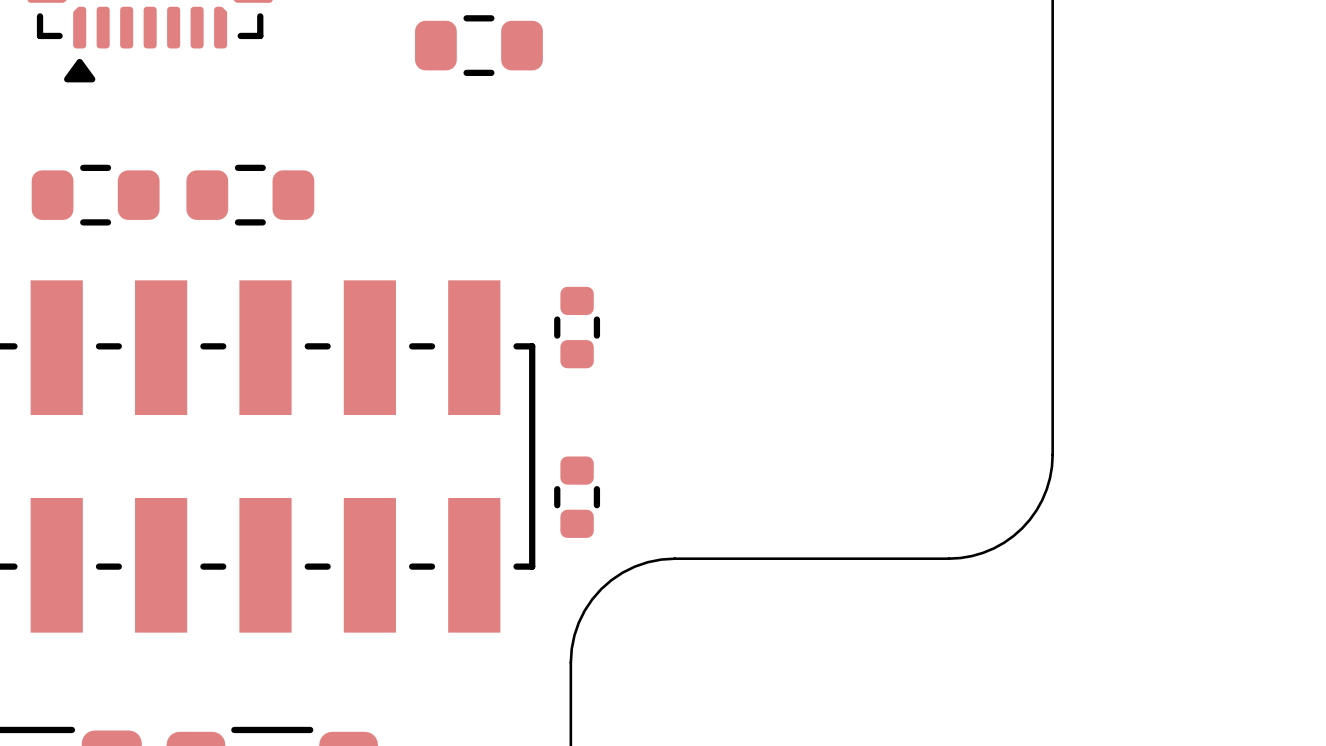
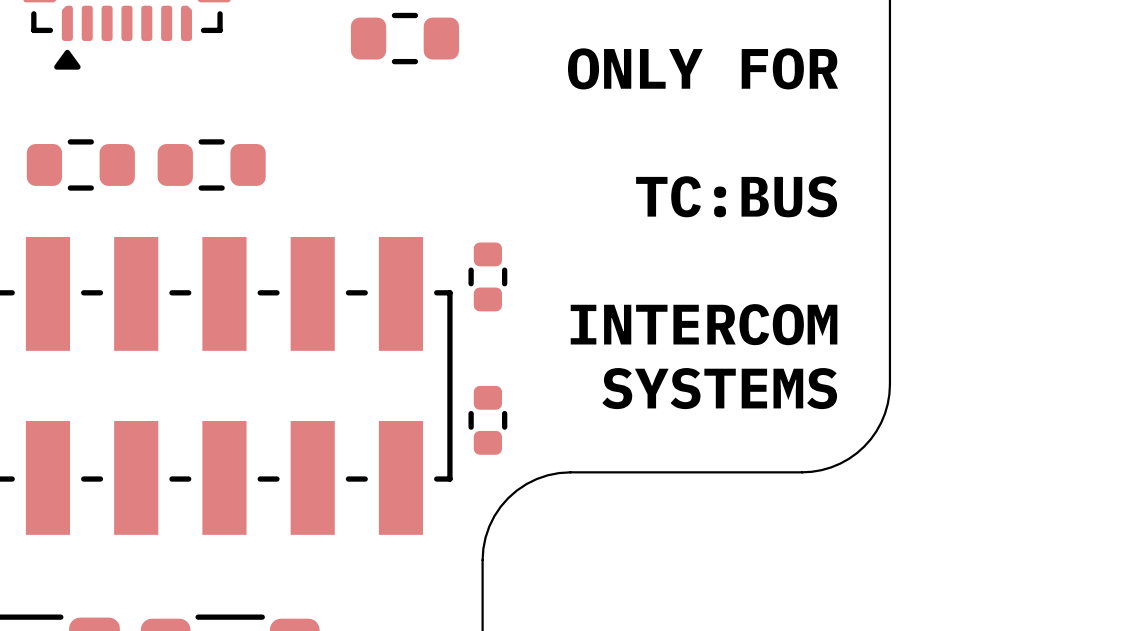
text: none -> ONLY FOR (703, 68)
text: none -> TC:BUS (736, 196)
text: none -> INTERCOM (704, 324)
text: none -> SYSTEMS (719, 388)

